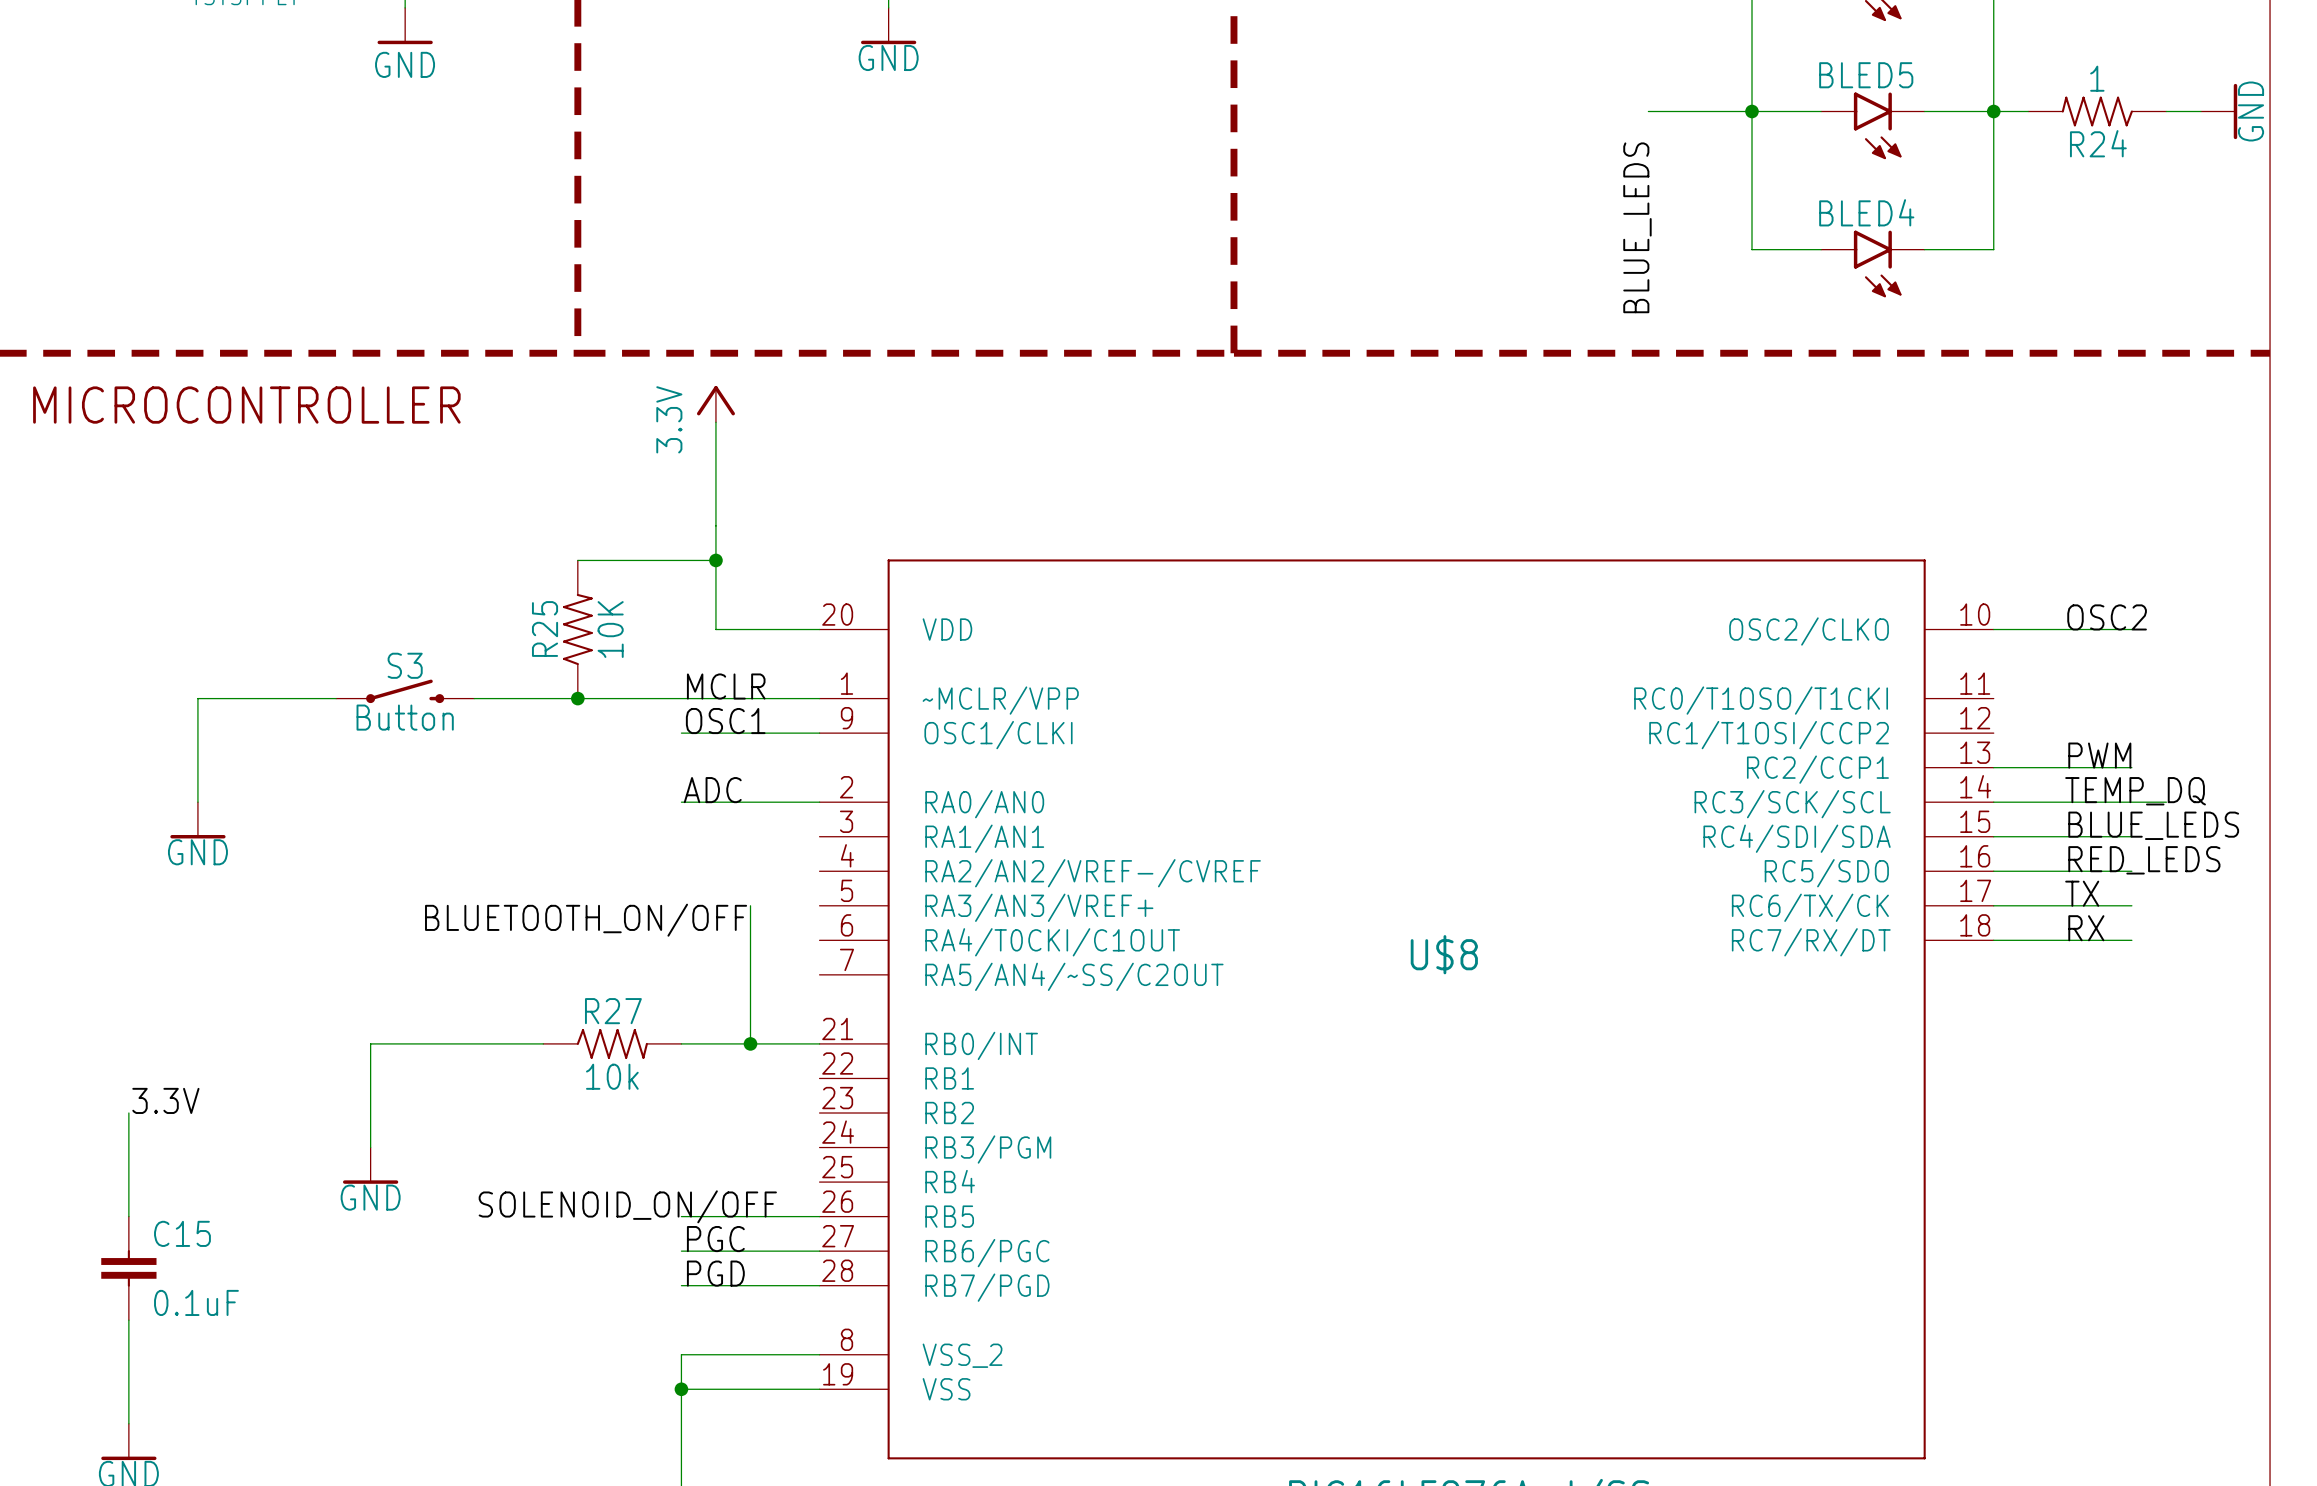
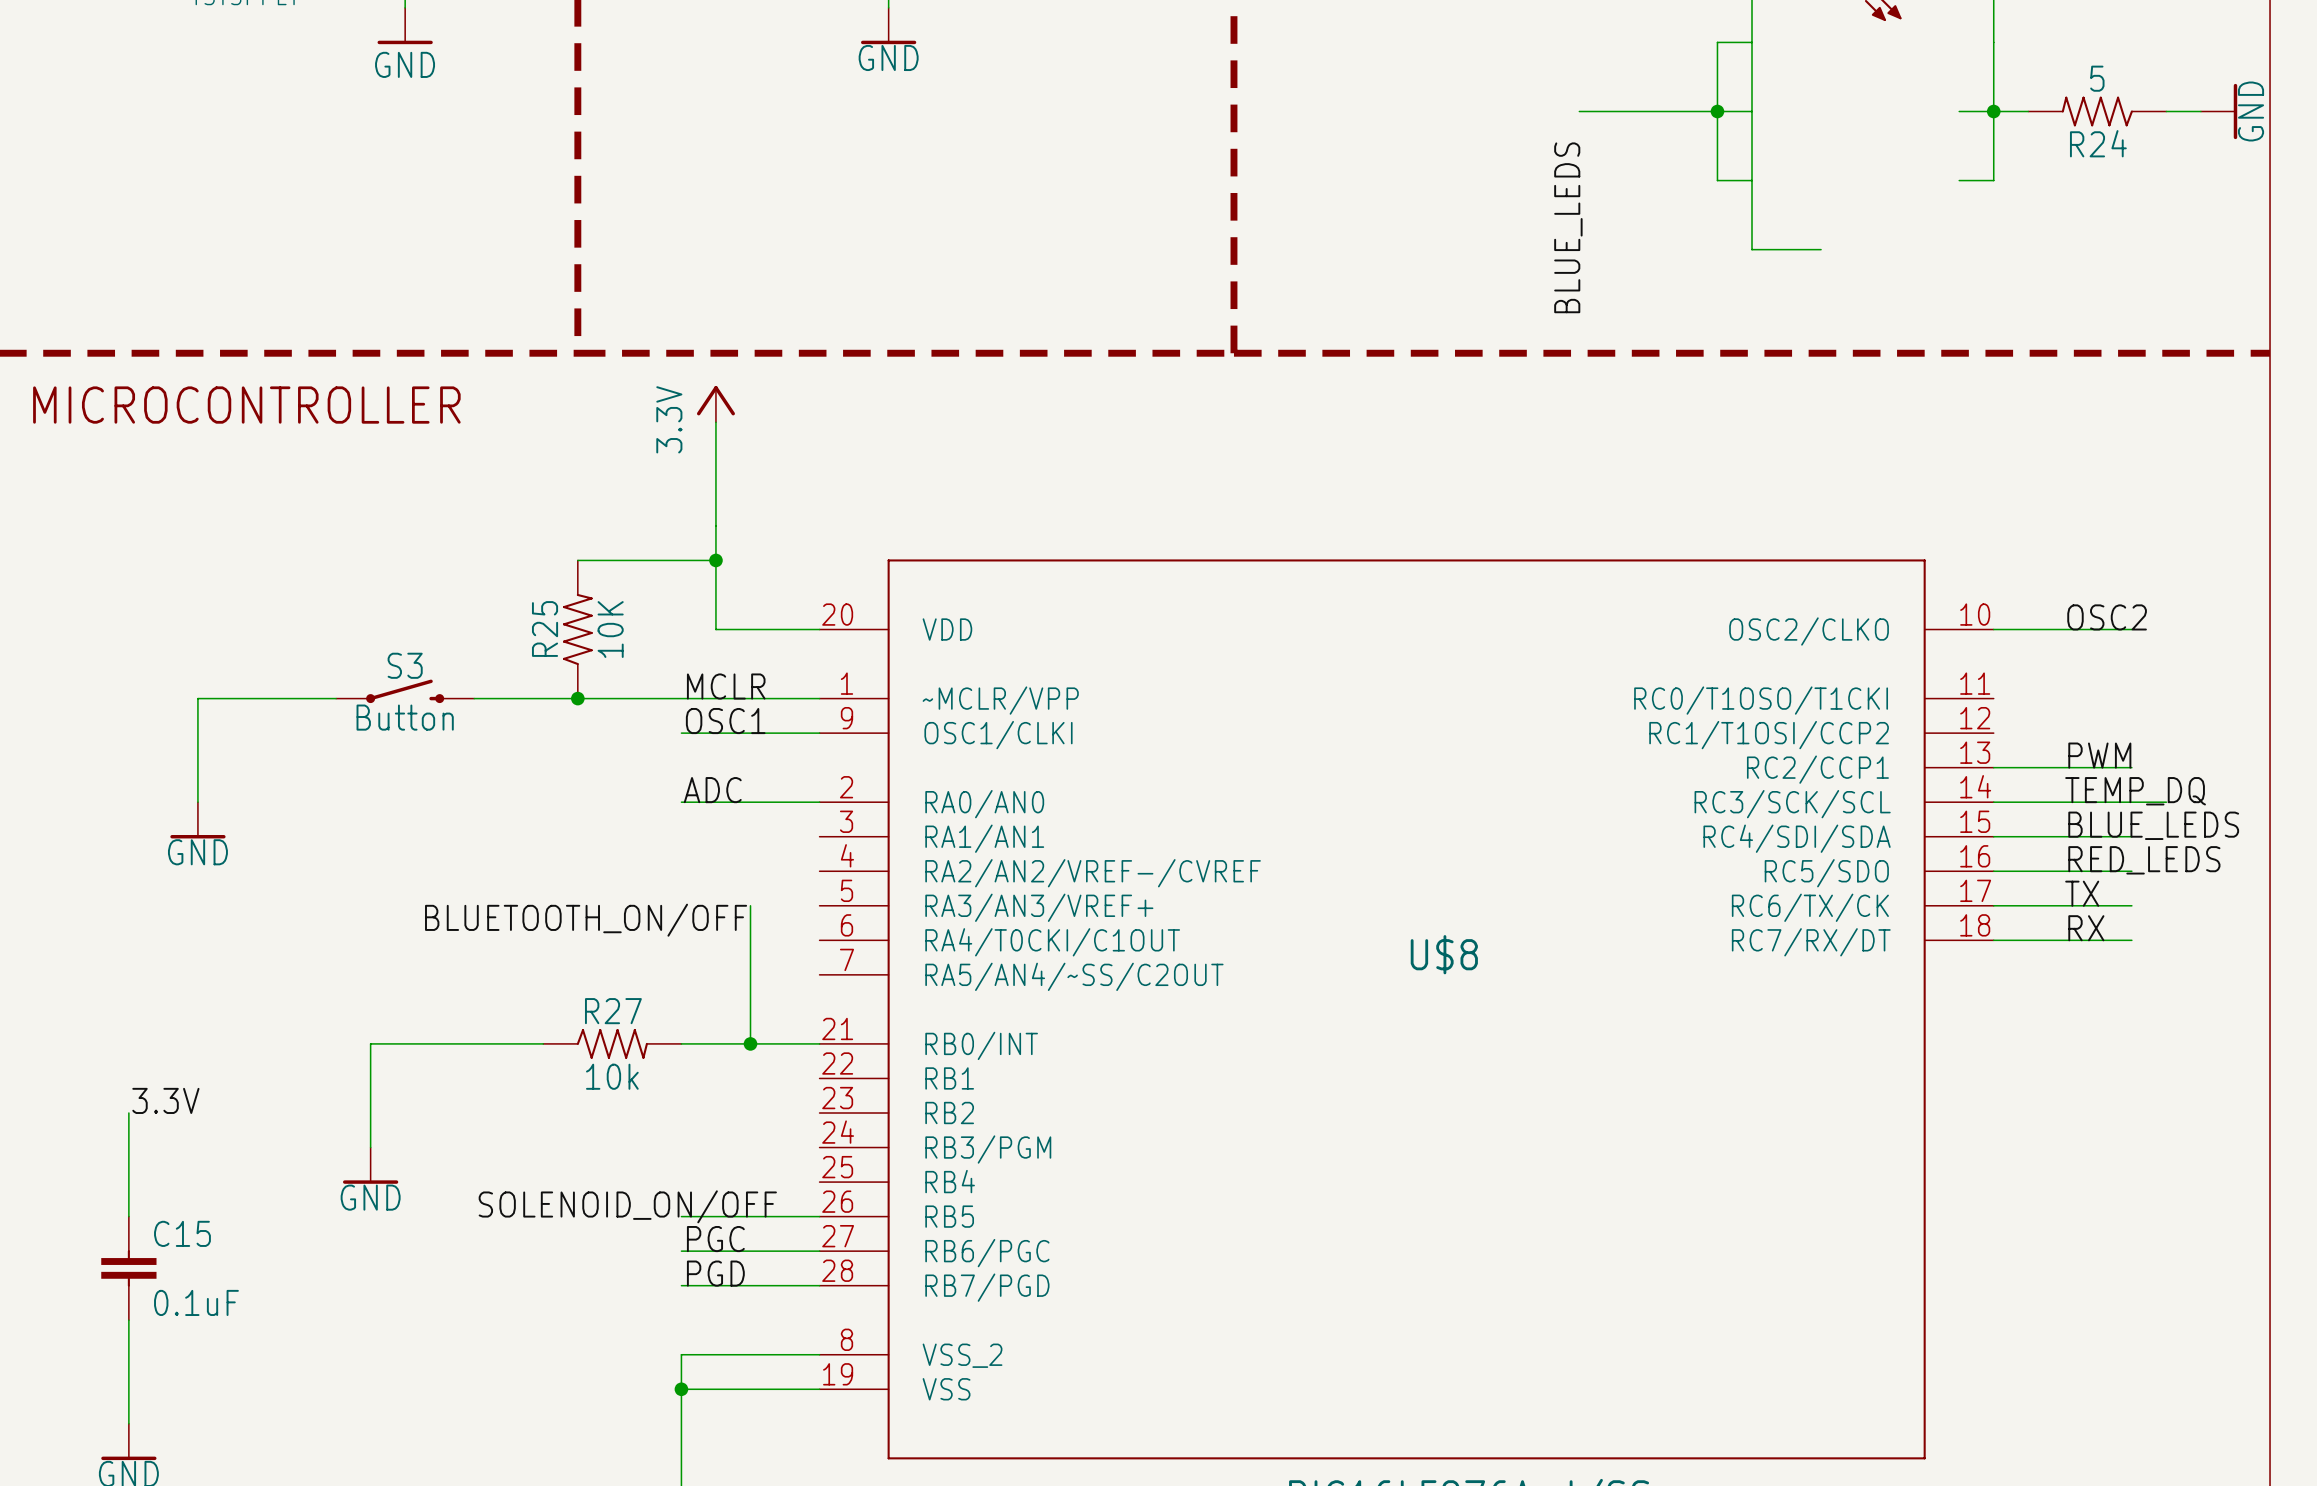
wire: none -> (1752, 42) (1717, 42) (1717, 180) (1752, 180)
R24 value: 1 (2097, 78) -> 5 (2097, 78)
wire: (1752, 111) (1821, 111) -> (1579, 111) (1648, 111)
junction position: (1752, 111) -> (1717, 111)
wire: (1924, 111) (1959, 111) -> none
BLED5: (1872, 125) -> none
wire: (1993, 180) (1993, 249) (1924, 249) -> (1993, 180) (1959, 180)
label position: BLUE_LEDS (1637, 227) -> BLUE_LEDS (1568, 227)
BLED4: (1872, 263) -> none

